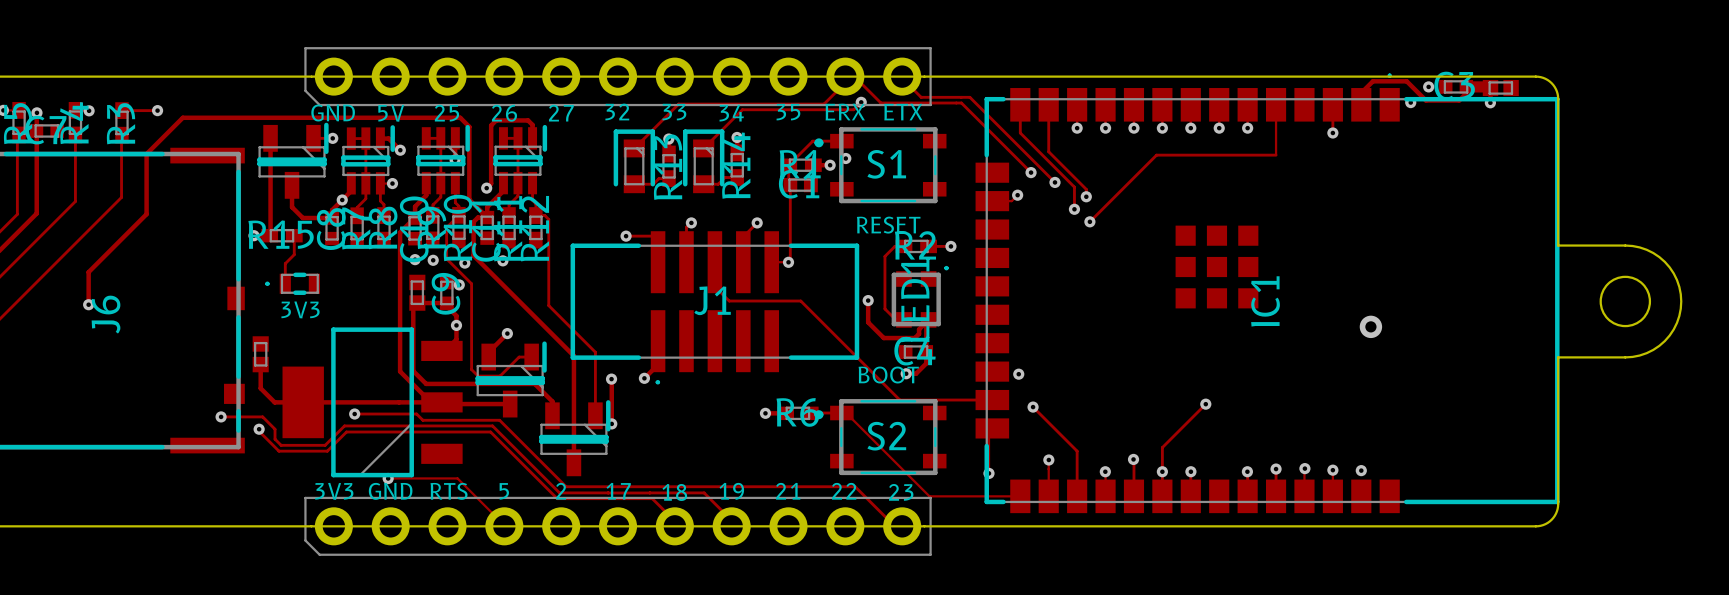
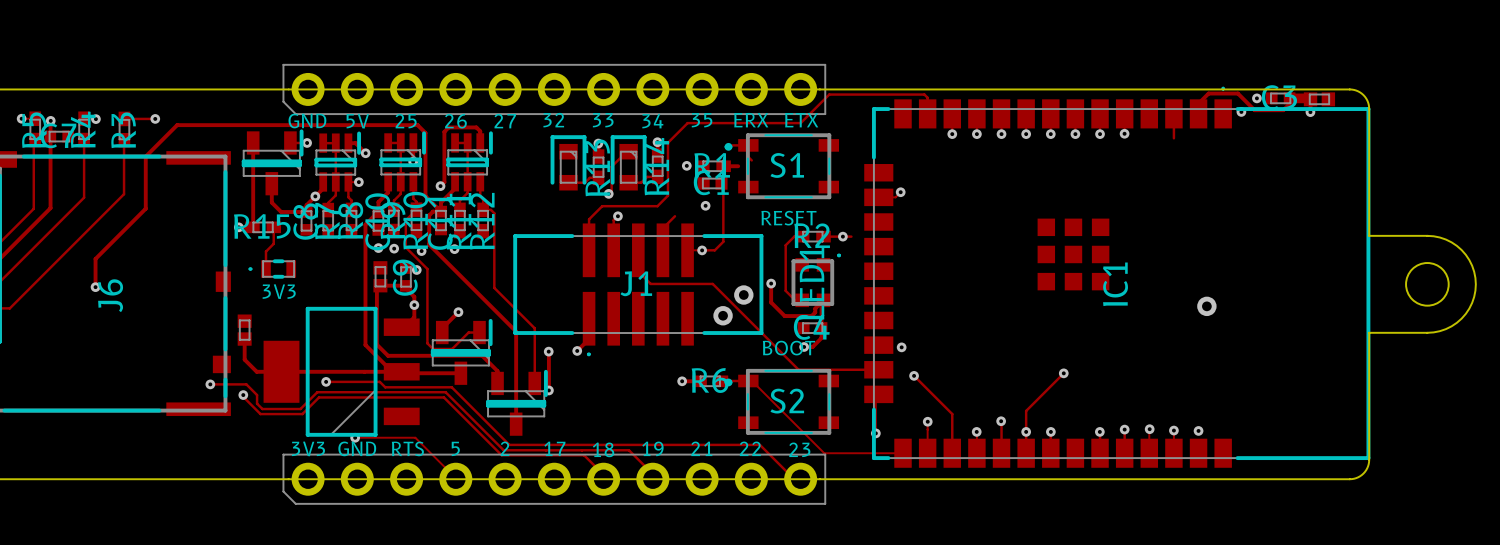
track: (845, 82) (824, 104) (678, 104) (634, 148) -> none
track: (851, 82) (860, 82) (880, 103) (961, 103) (1031, 172) -> none
track: (902, 92) (902, 82) (906, 82) (921, 97) (969, 97) (1054, 182) -> none
track: (861, 102) (853, 109) (742, 109) (703, 148) -> none
via: (861, 102) -> none
track: (1020, 104) (1020, 132) (1074, 187) (1074, 209) -> none
track: (1048, 104) (1048, 151) (1086, 189) (1086, 196) -> (927, 113) (927, 97) (924, 94) (829, 94) (800, 123) (687, 123) (667, 142) (667, 195) (657, 206) (602, 206) (589, 219) (589, 230)
track: (1276, 127) (1276, 155) (1156, 155) (1089, 221) -> none
via position: (1332, 132) -> (1124, 133)
track: (823, 141) (812, 141) (788, 165) (790, 260) (788, 262) -> (723, 166) (723, 241) (714, 250) (702, 250)
track: none -> (626, 151) (611, 166) (611, 190) (608, 193)
via: (845, 158) -> none
via: none -> (686, 165)
via: (830, 165) -> none
via: (1031, 172) -> none
via: (1054, 182) -> none
via: (1086, 196) -> none
via: none -> (608, 193)
via: (1074, 209) -> none
via: none -> (705, 205)
via: (1089, 221) -> none
via: (757, 222) -> none
track: (626, 236) (655, 236) (658, 238) -> none
via: (626, 236) -> none
track: none -> (842, 236) (851, 236)
via: none -> (743, 295)
via: none -> (723, 315)

